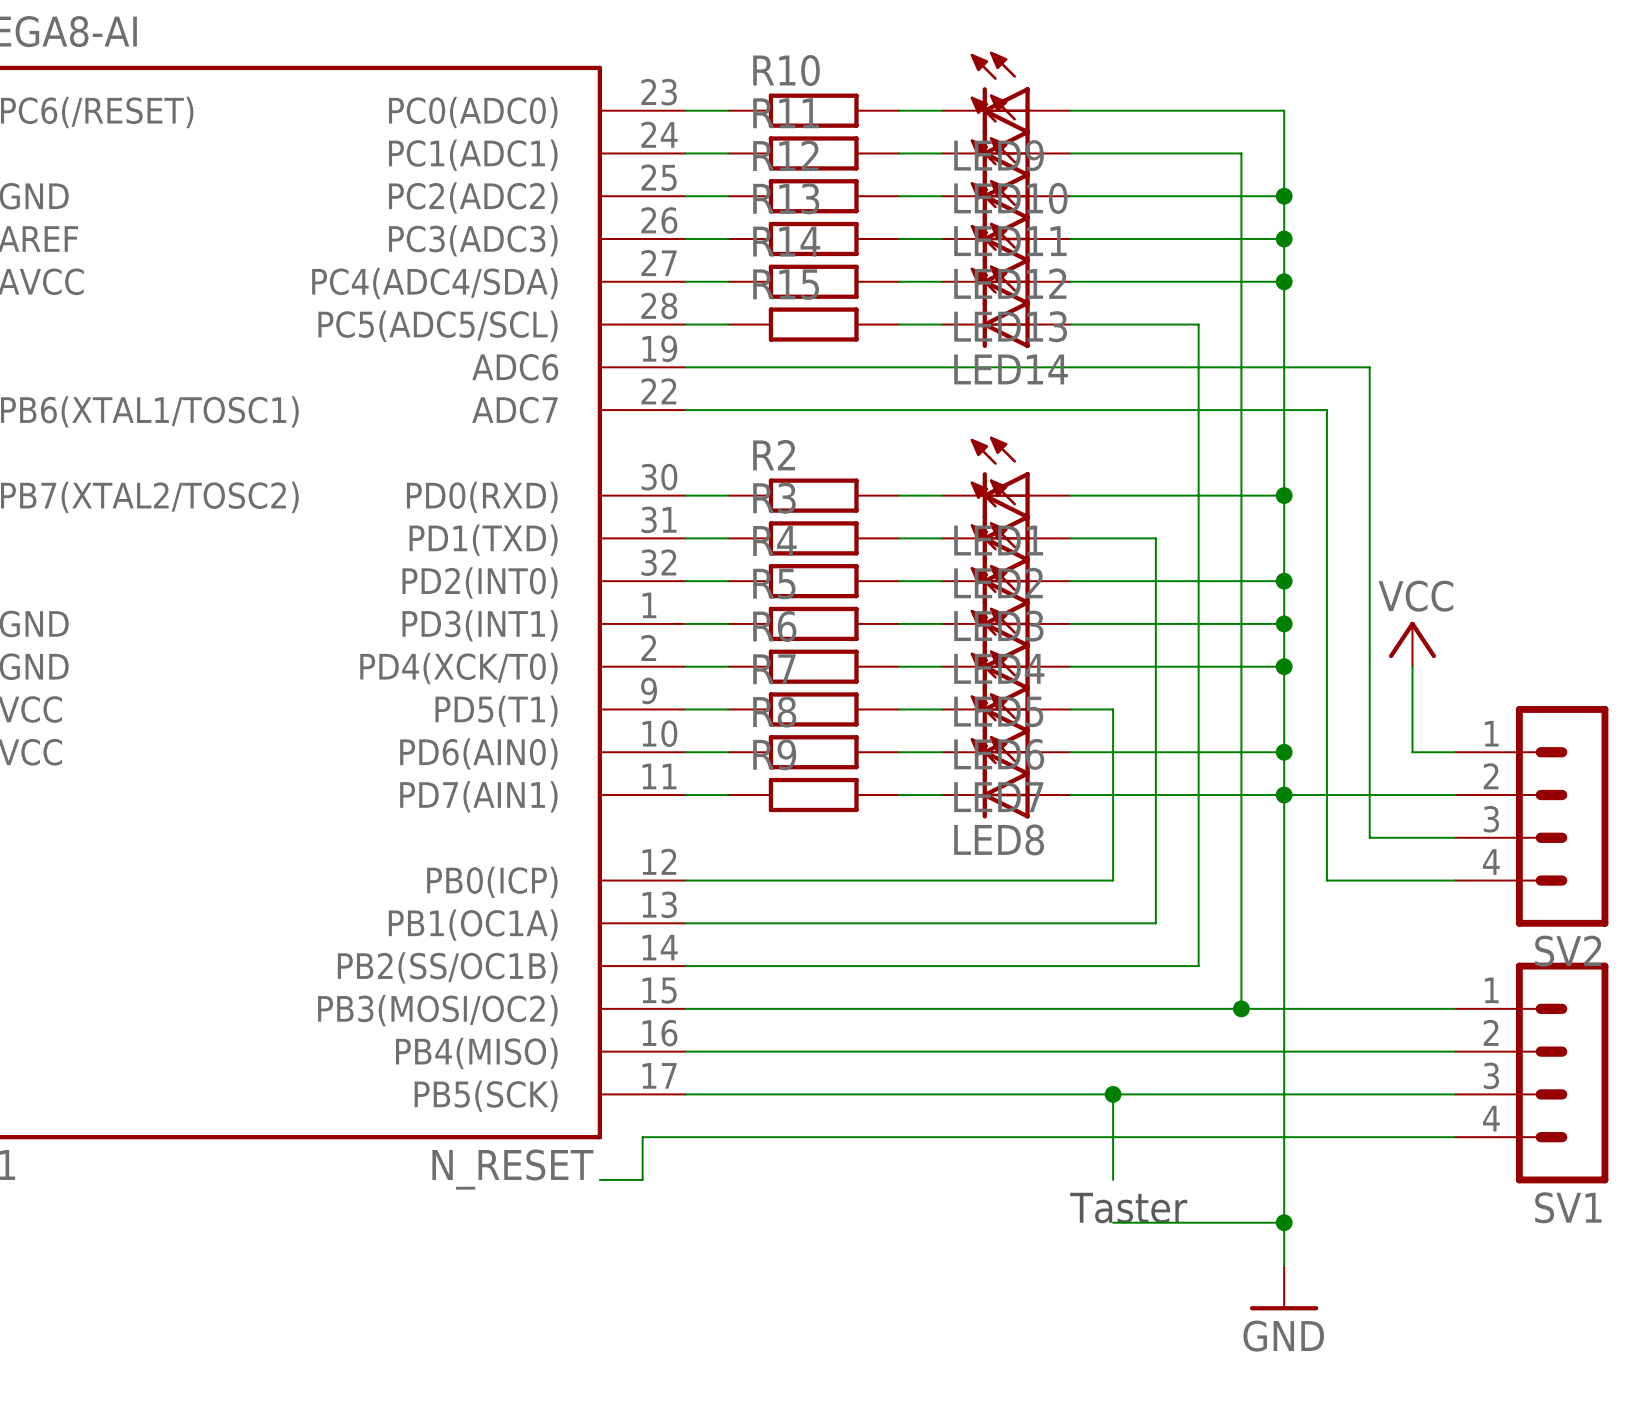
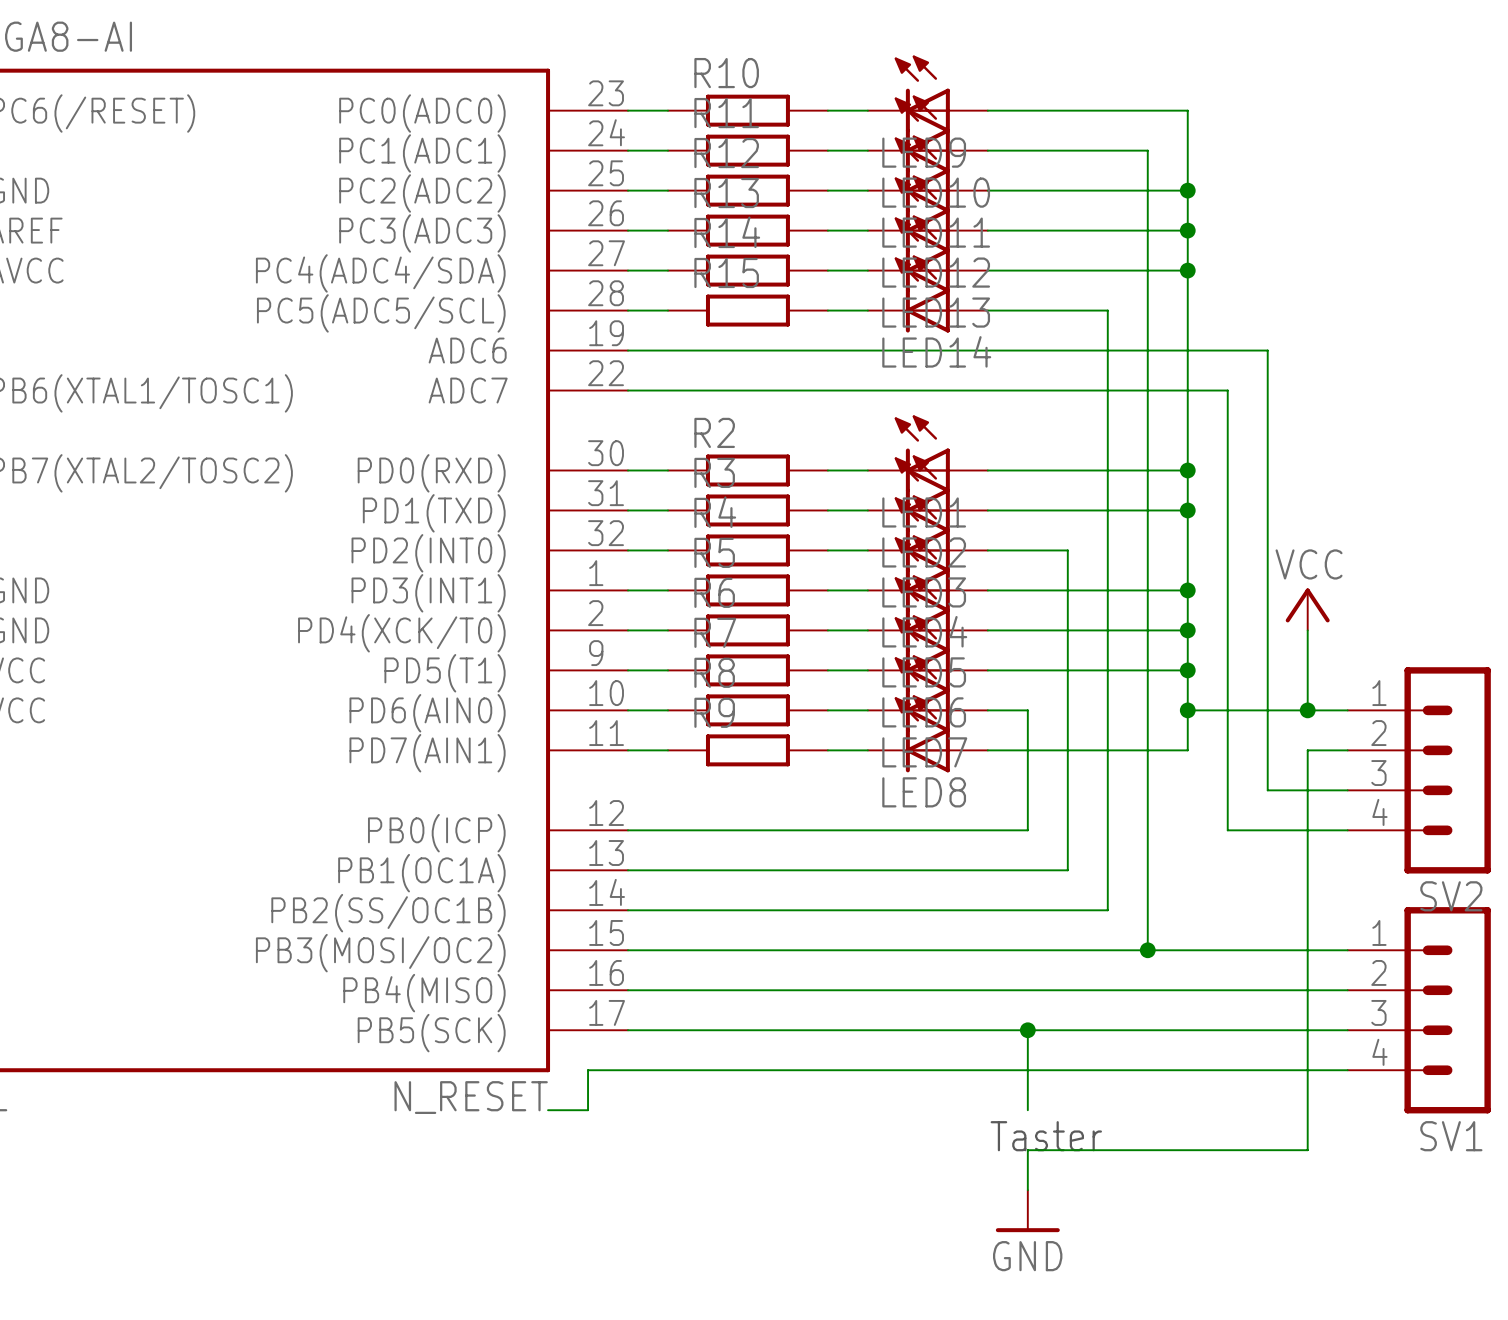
wire: (1155, 538) (1155, 581) (1284, 581) -> (1067, 510) (1187, 510)
junction position: (1284, 581) -> (1187, 510)
wire: (1113, 709) (1113, 752) (1284, 752) -> (1027, 670) (1187, 670)
junction: none -> (1187, 670)
wire: none -> (1187, 710) (1307, 710)
junction: none -> (1307, 710)
junction: (1284, 795) -> none
wire: (1412, 795) (1284, 795) (1284, 1265) -> (1307, 750) (1307, 1150) (1187, 1150)
wire: none -> (1027, 1150) (1027, 1190)
junction: (1284, 1222) -> none
power symbol position: GND (1284, 1287) -> GND (1027, 1211)

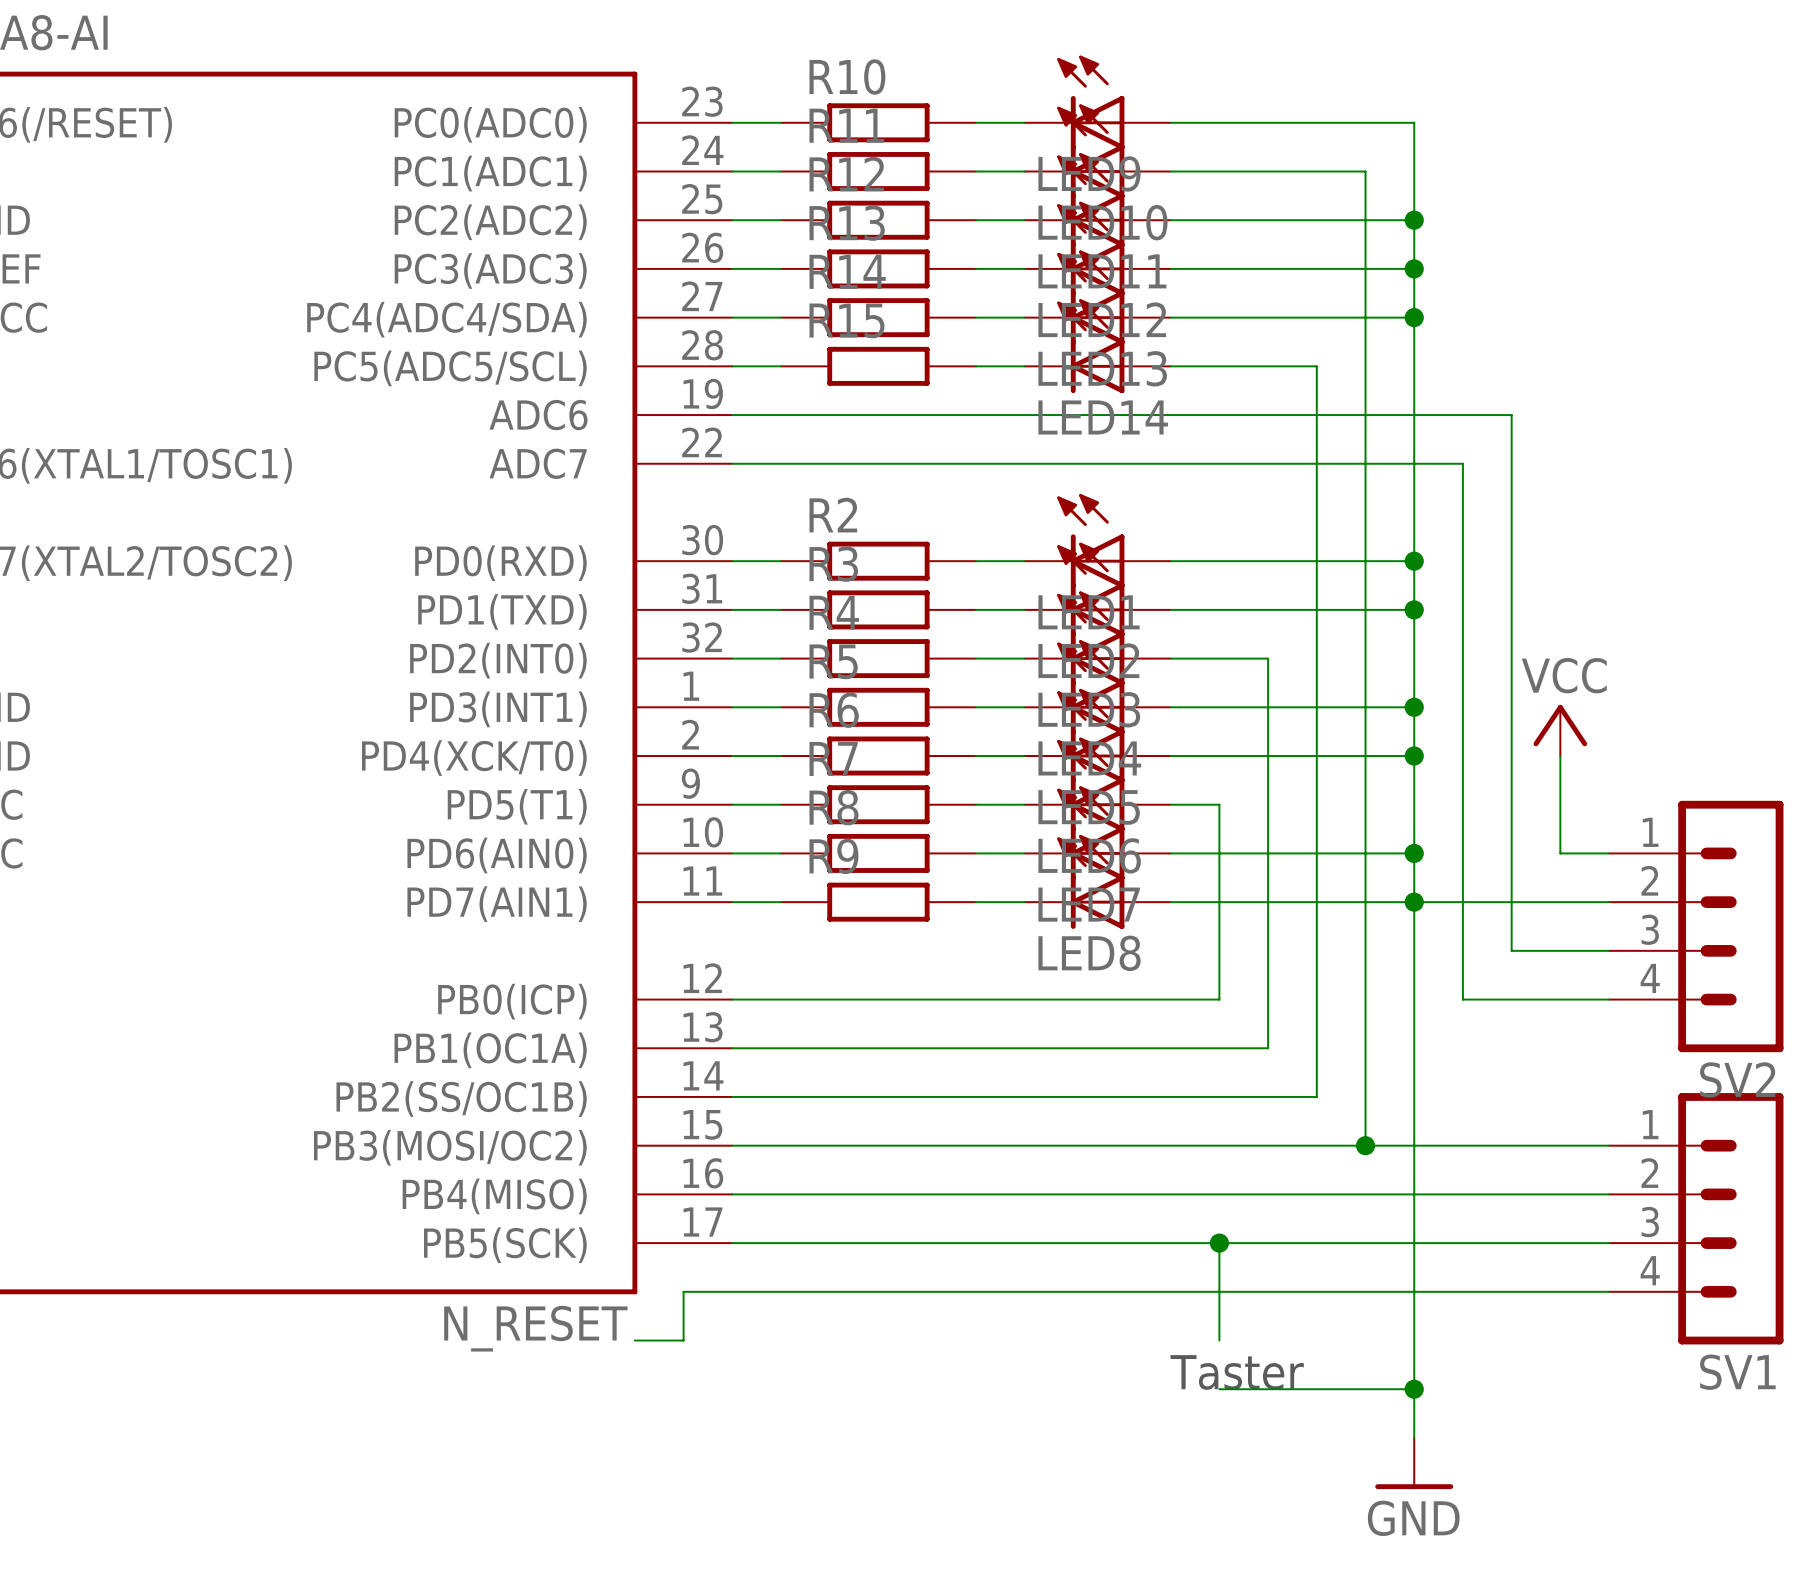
wire: (1027, 670) (1187, 670) -> (1219, 804) (1219, 853) (1414, 853)
junction: (1187, 670) -> none
wire: (1187, 710) (1307, 710) -> none
junction: (1307, 710) -> none
junction: none -> (1414, 902)
wire: (1307, 750) (1307, 1150) (1187, 1150) -> (1560, 902) (1414, 902) (1414, 1437)
wire: (1027, 1150) (1027, 1190) -> none
junction: none -> (1414, 1389)
power symbol position: GND (1027, 1211) -> GND (1414, 1463)

